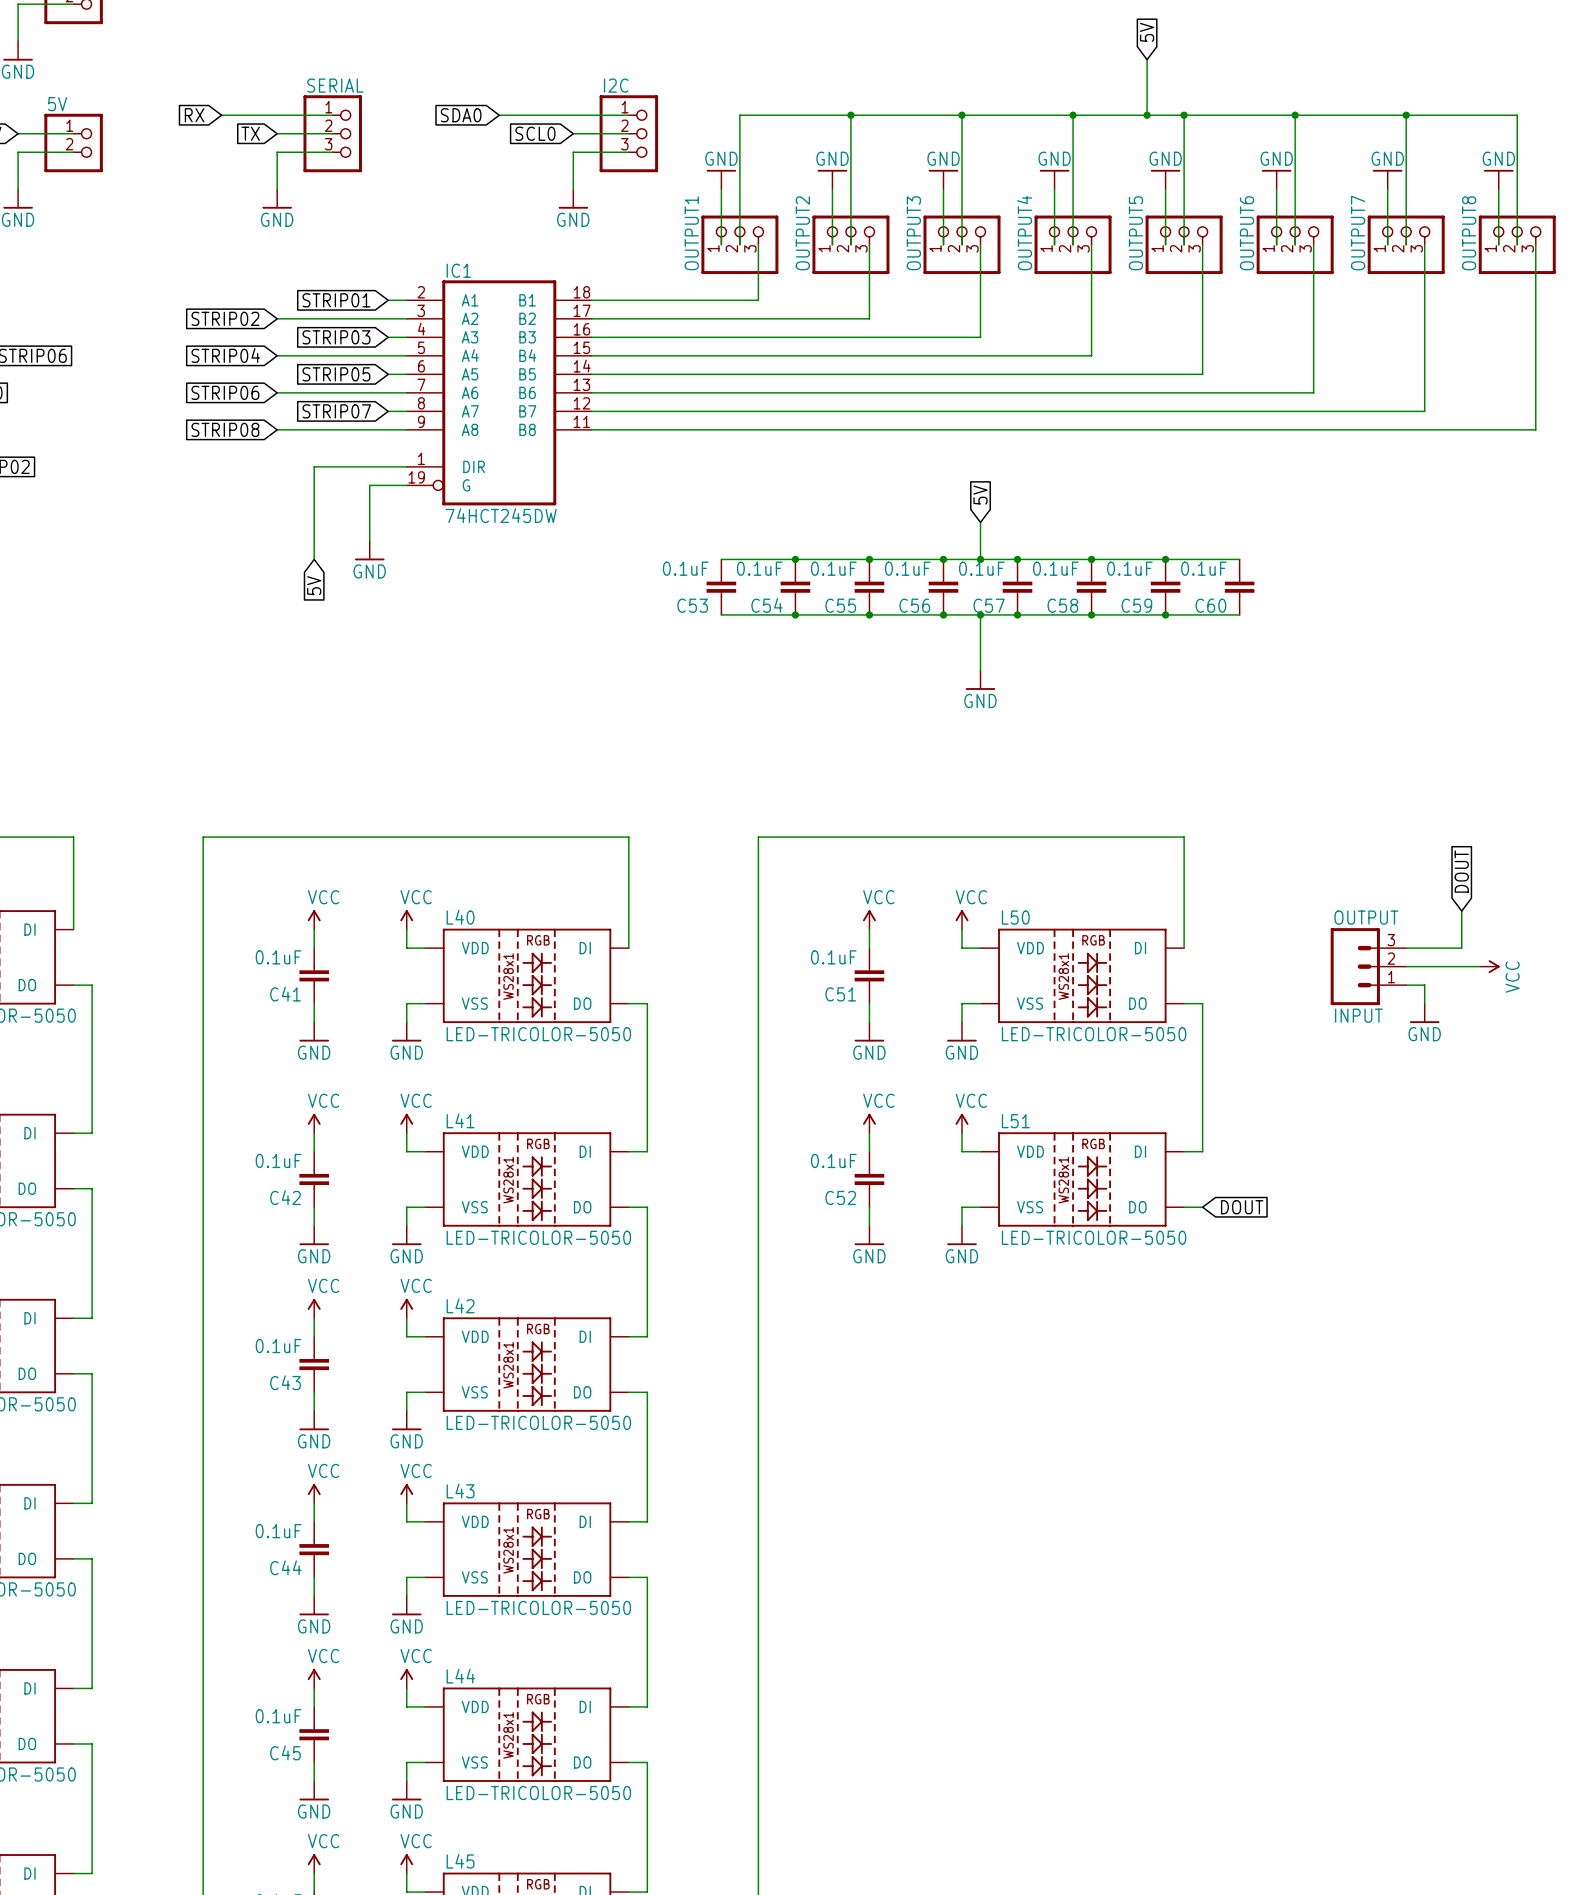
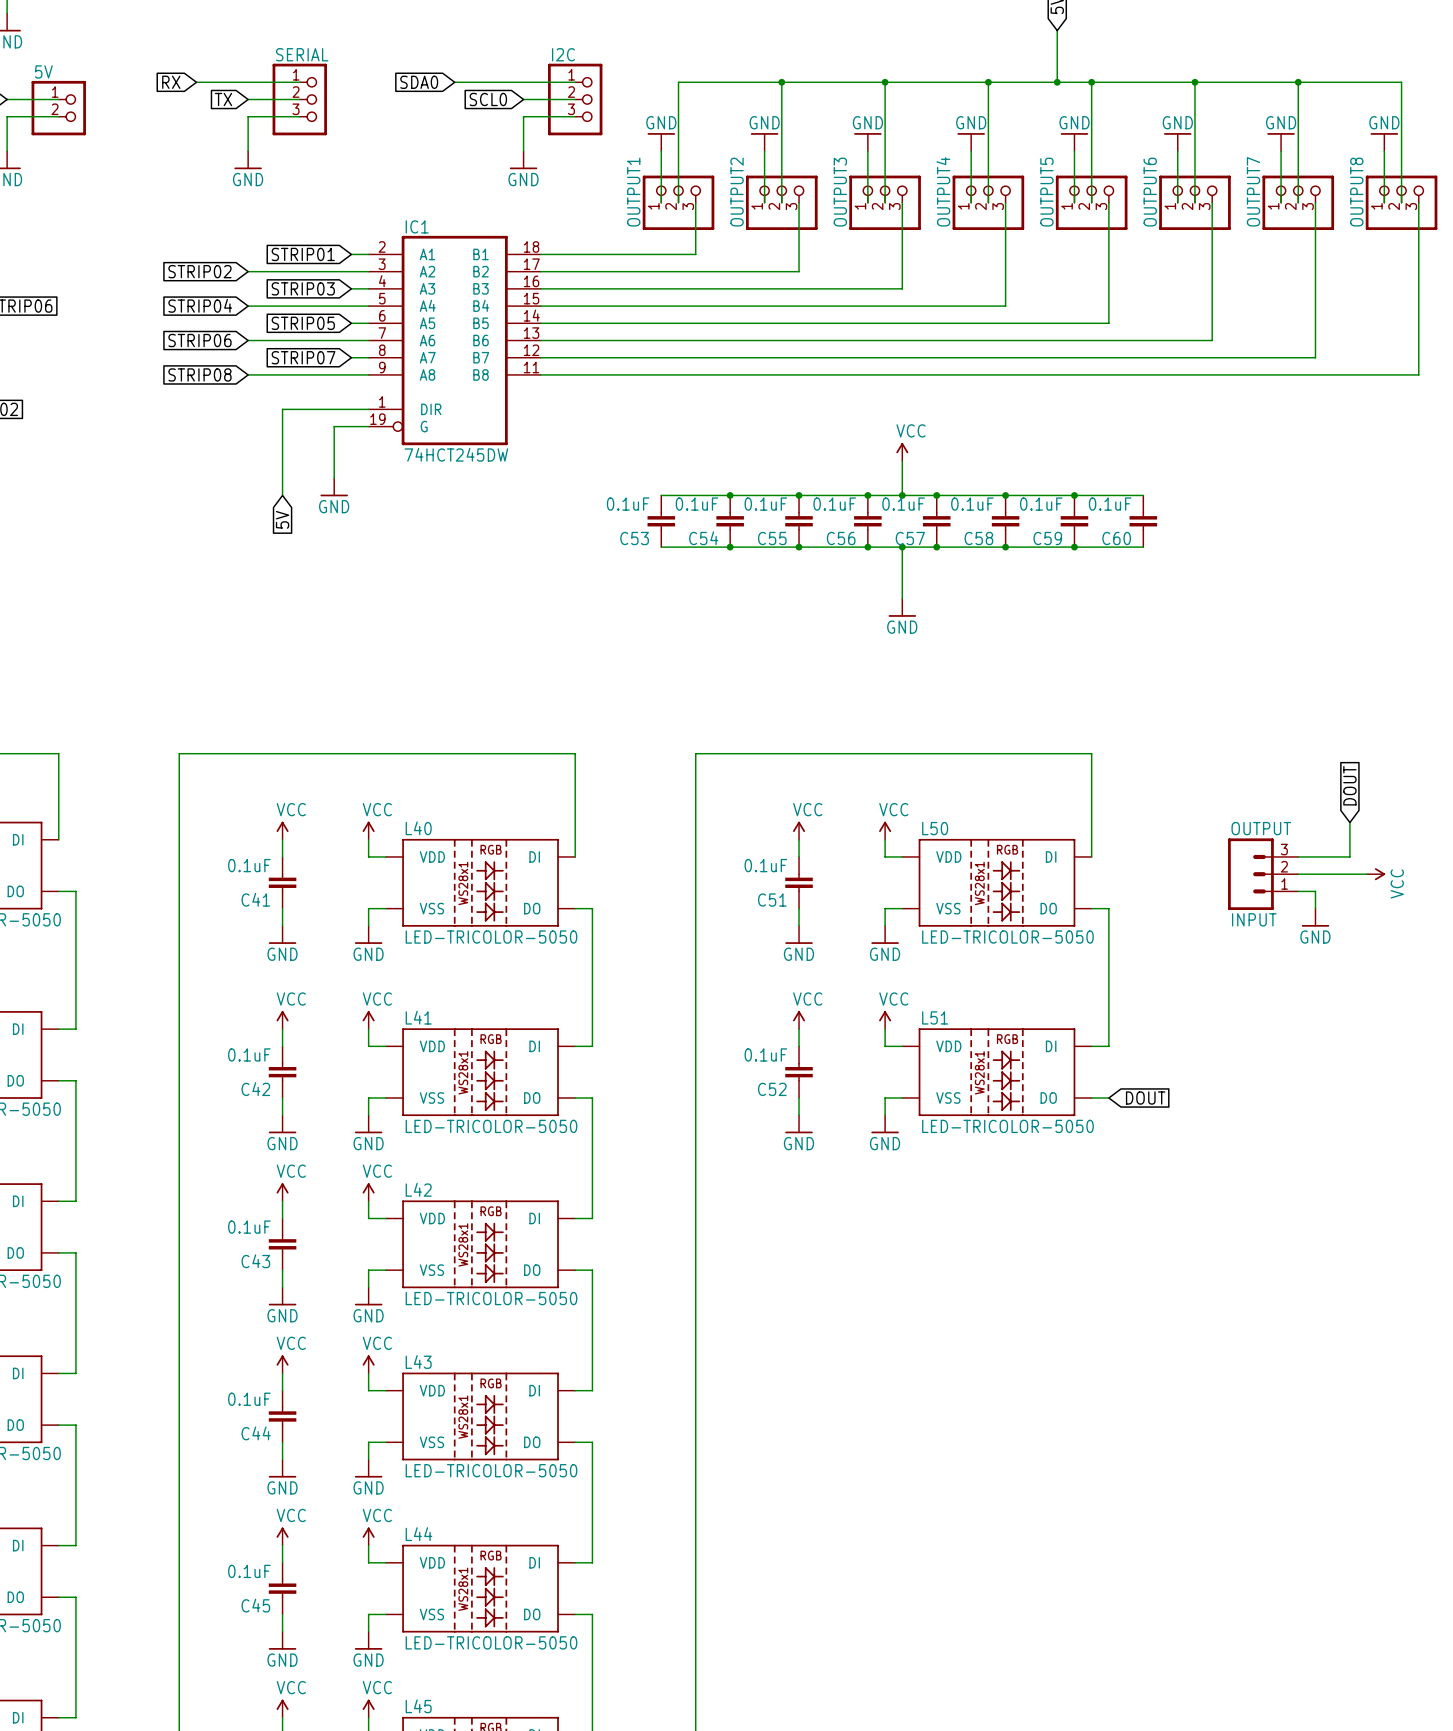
global label: 5V (980, 495) -> none
power symbol: none -> VCC (902, 451)

